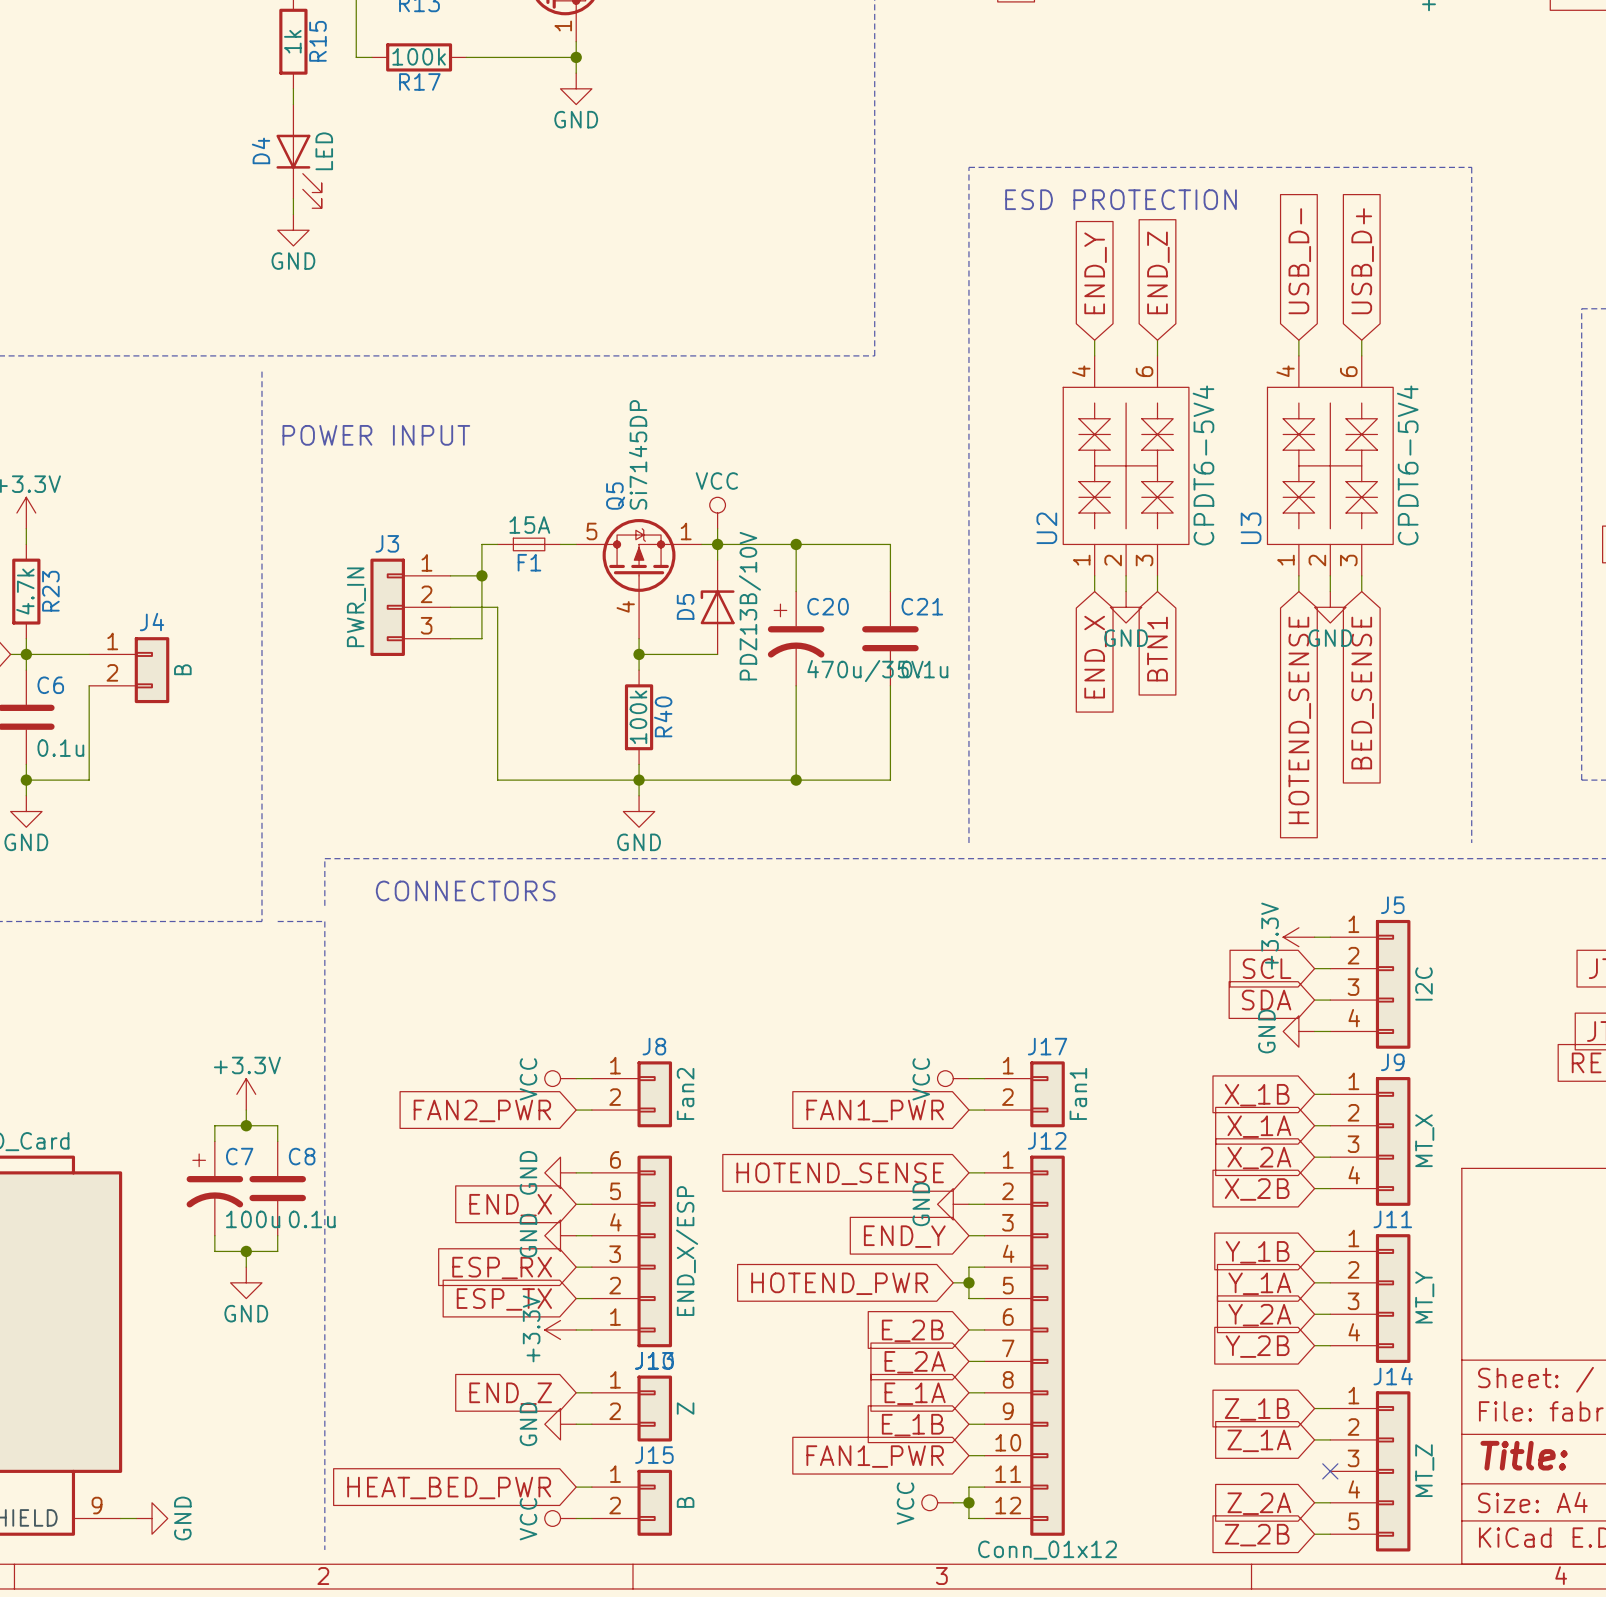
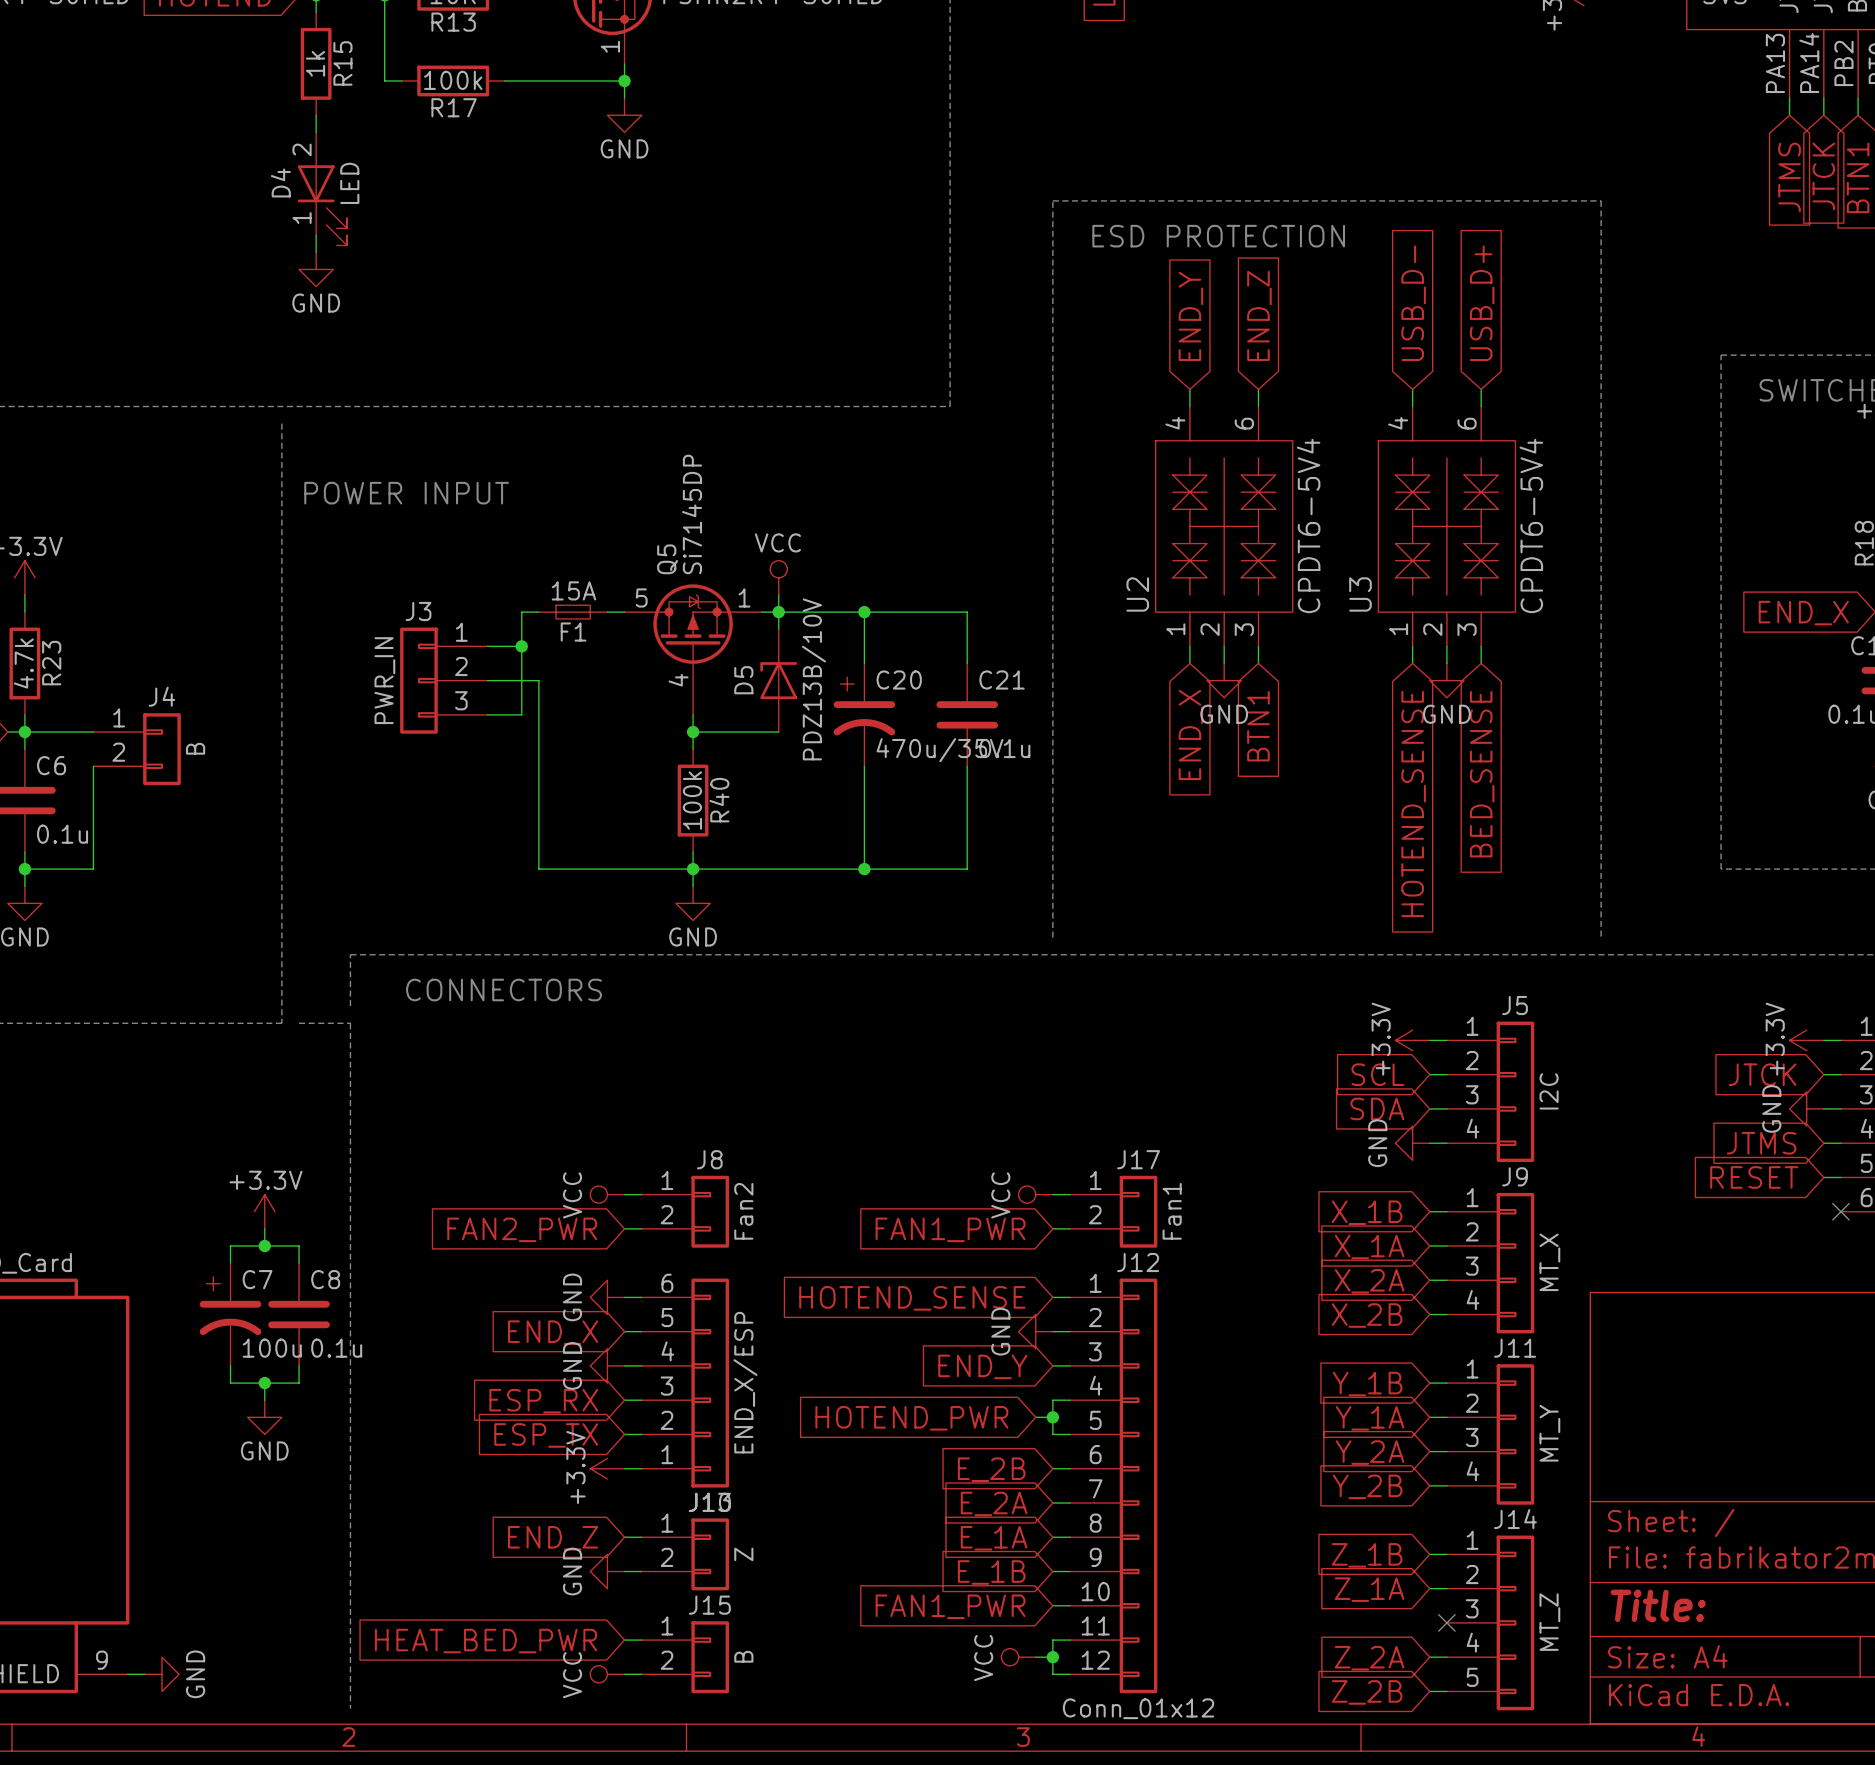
D4 pin number: none -> 2 (302, 149)
D4 pin number: none -> 1 (302, 218)

